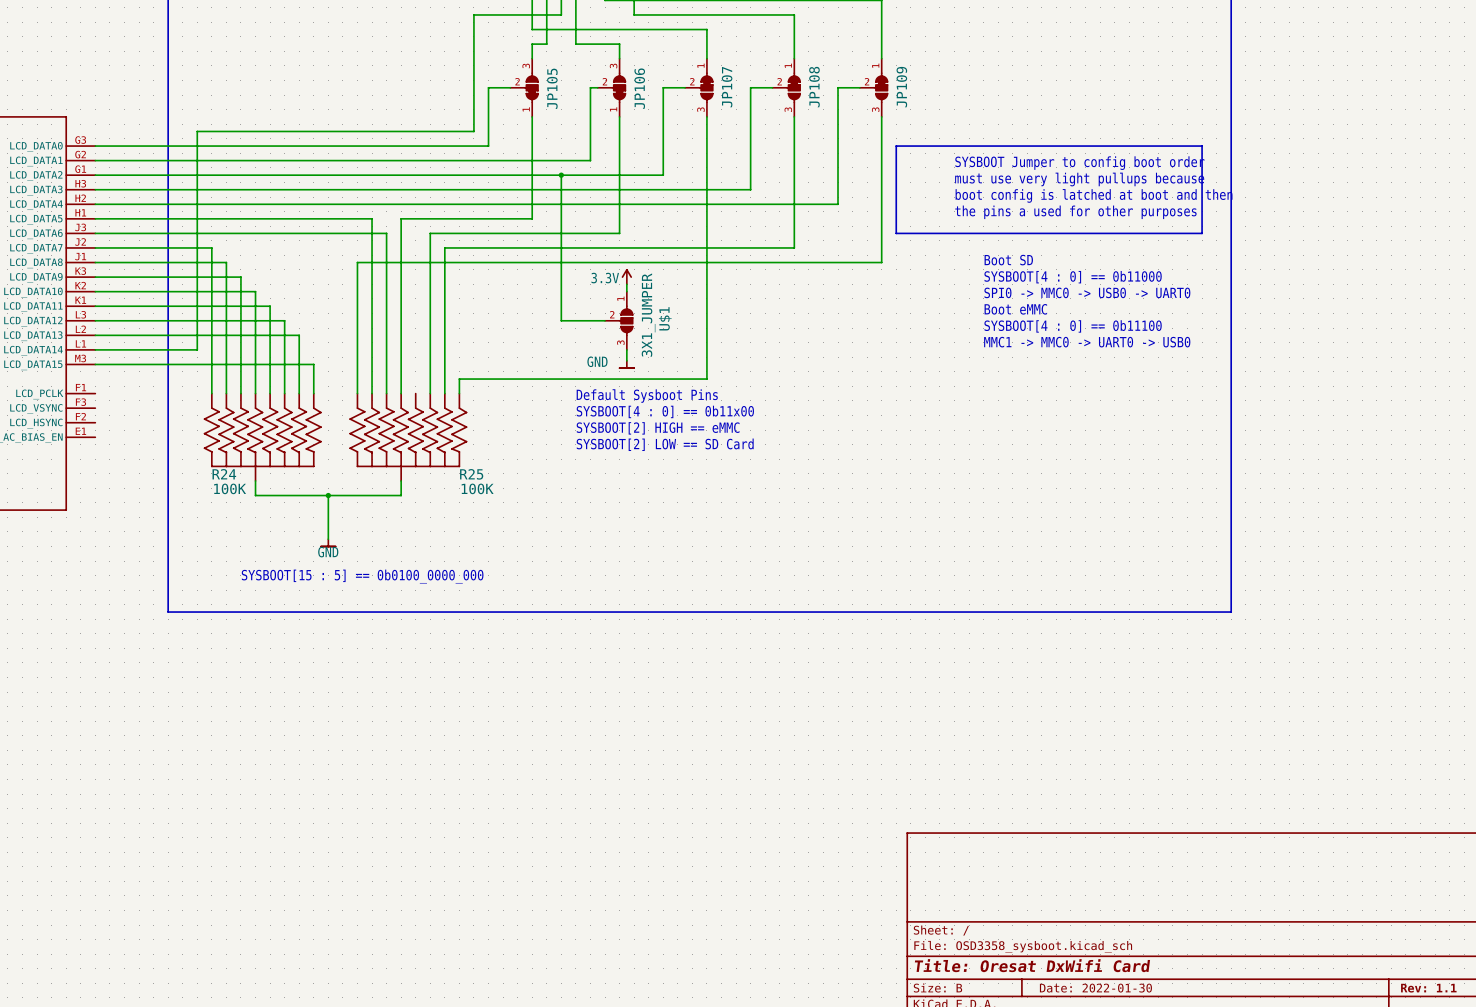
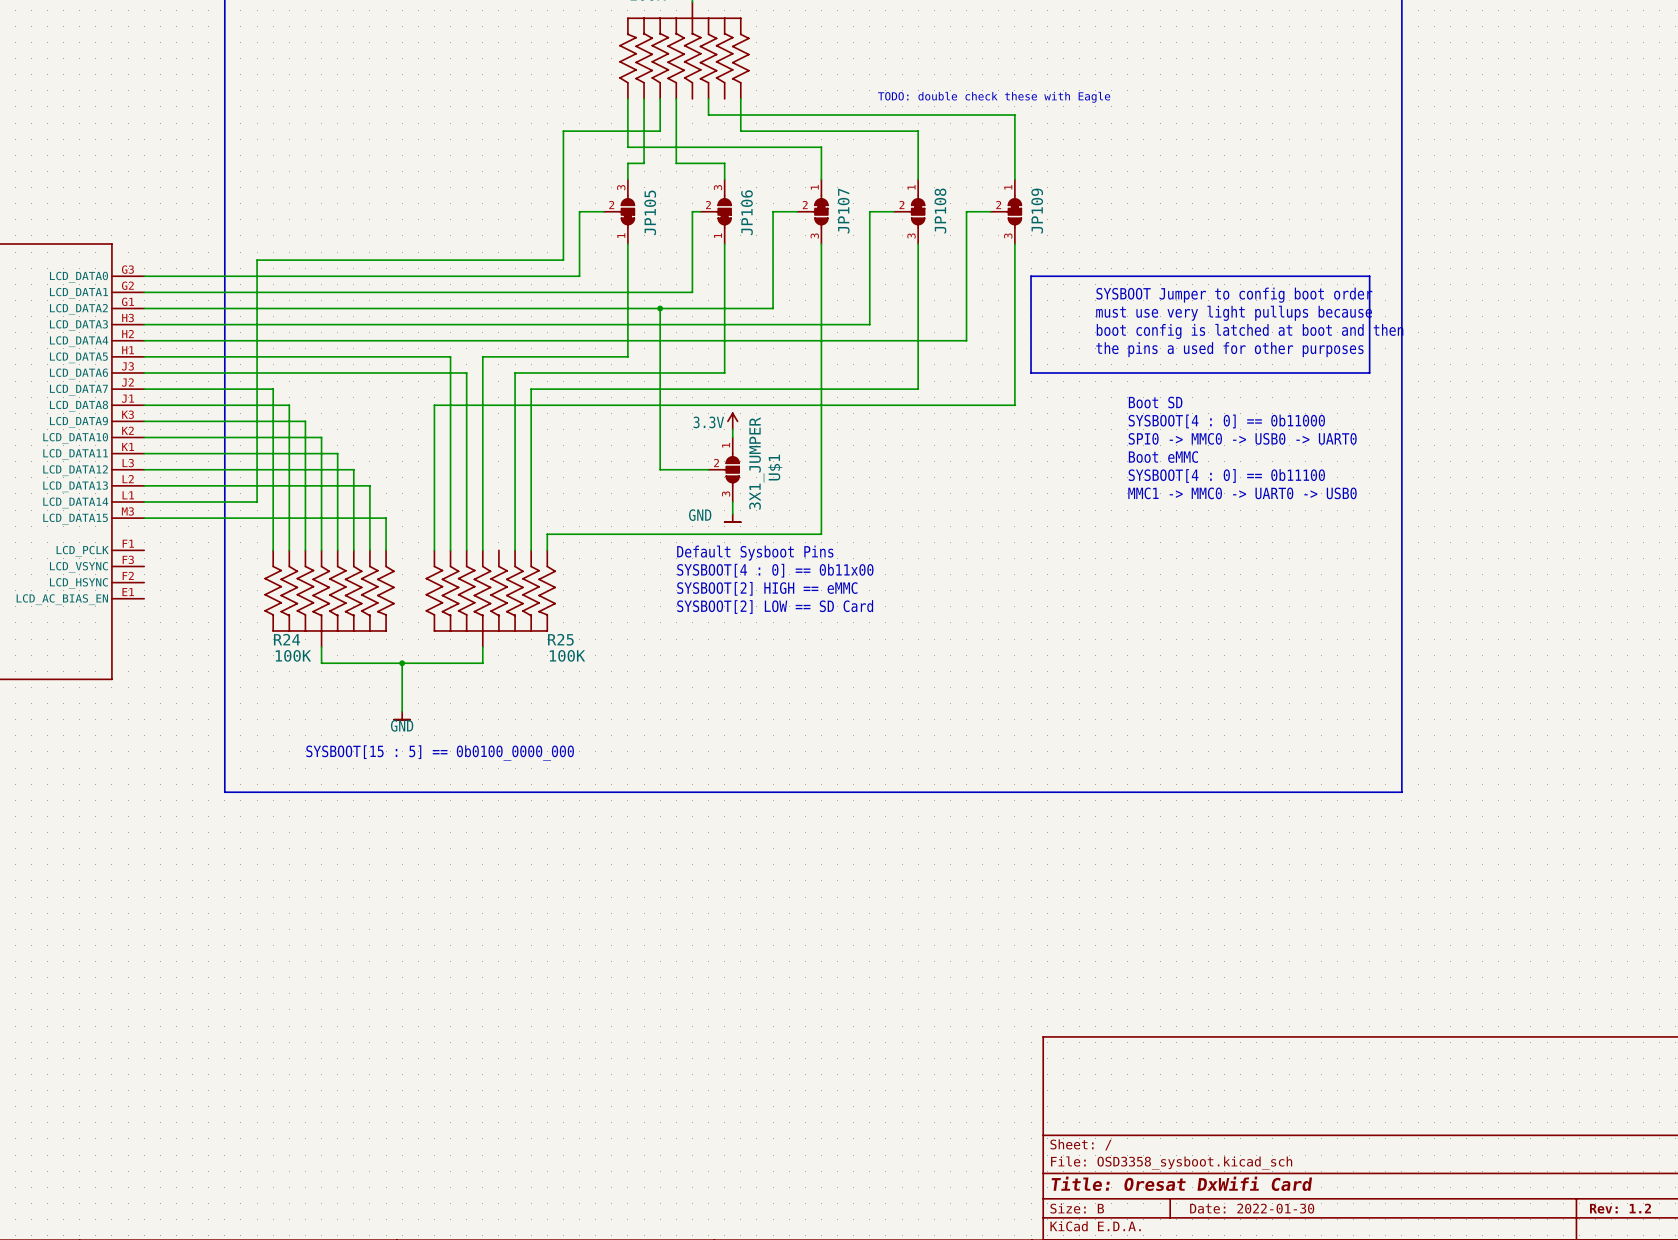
title block: Rev: 1.1 (1428, 988) -> Rev: 1.2 (1620, 1208)

